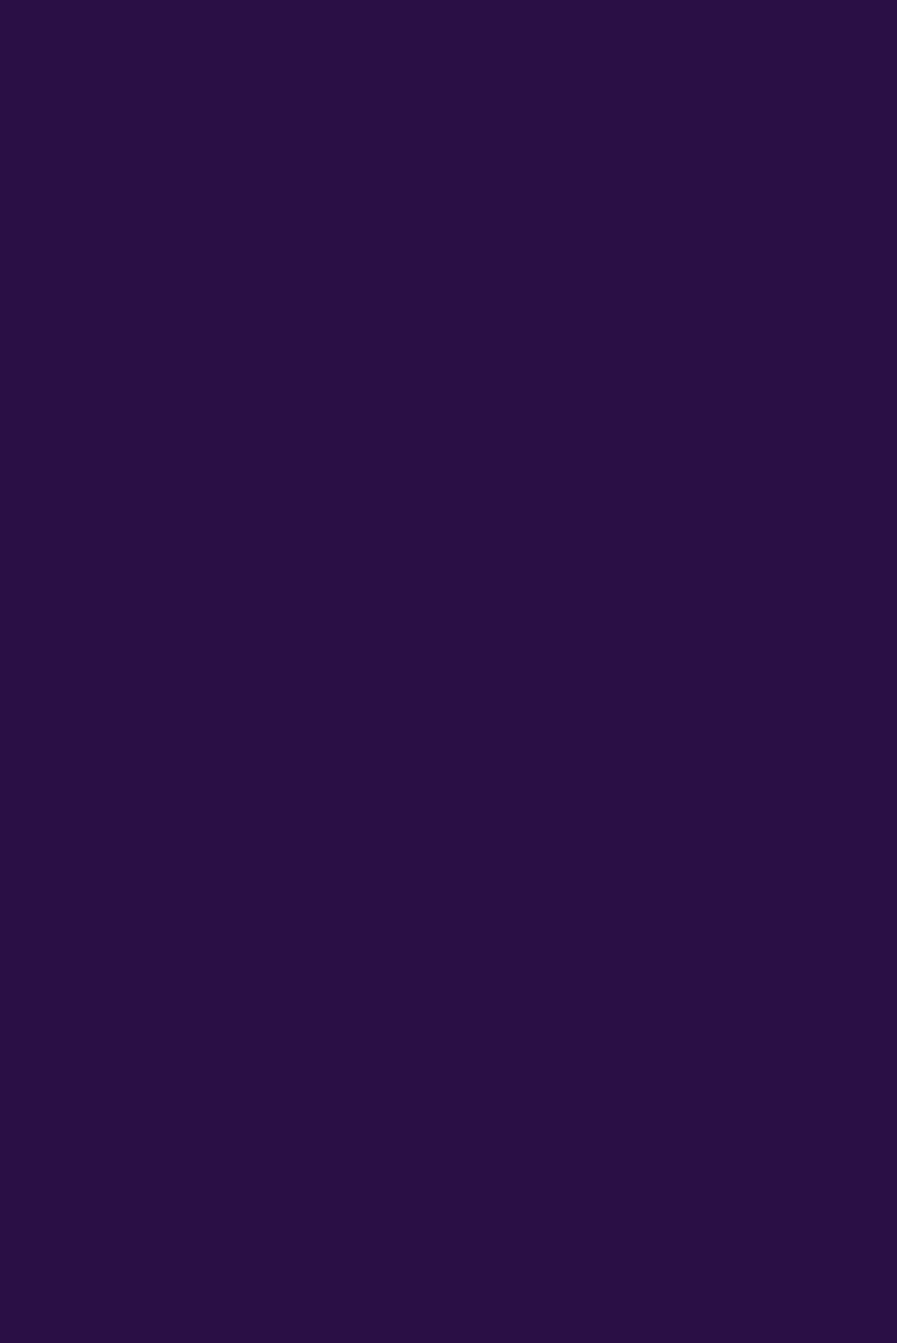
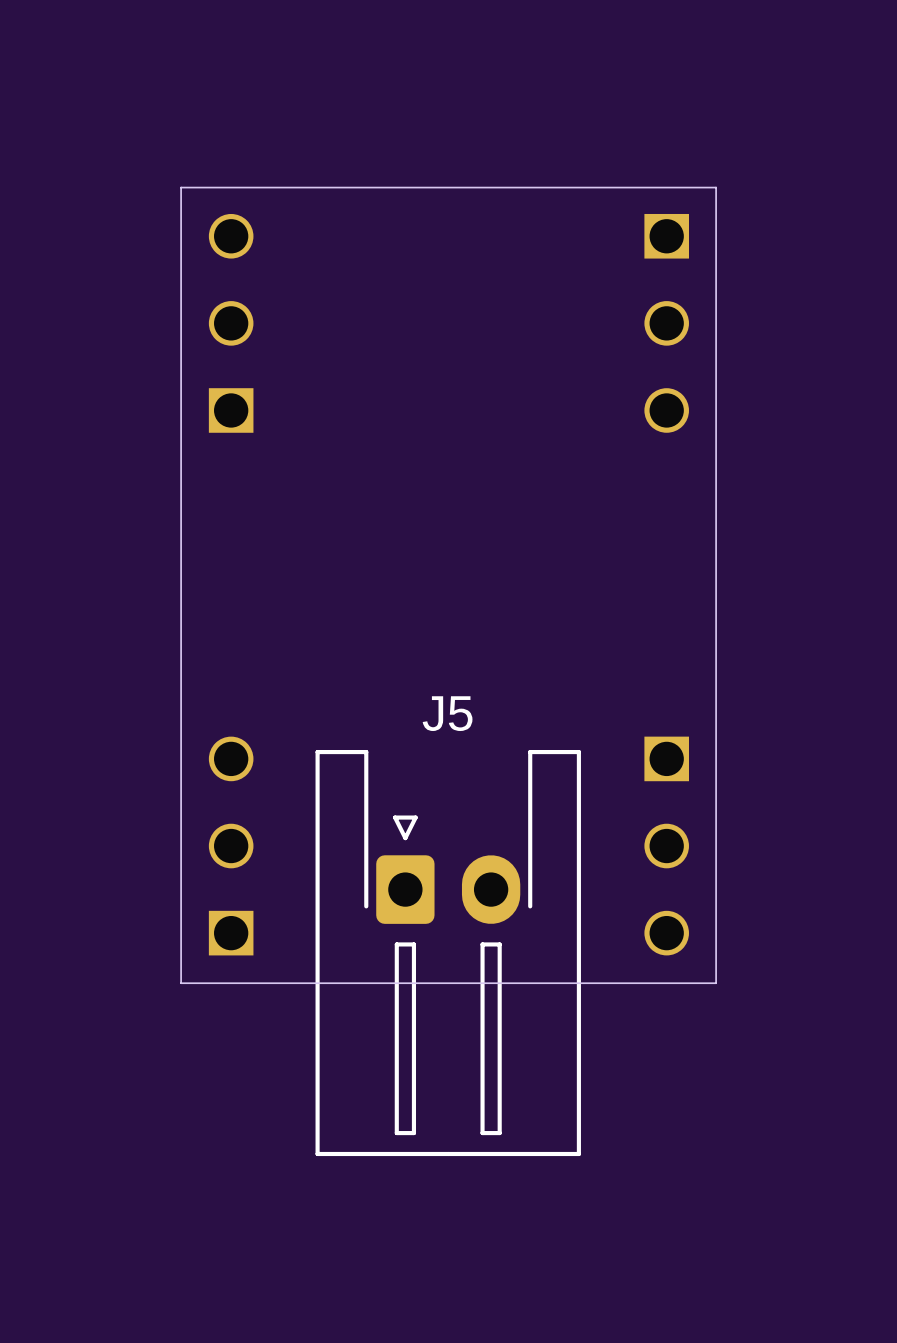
board edge: none -> (716, 187) (716, 983) (181, 983) (181, 187) (716, 187)
part: none -> (231, 323)
part: none -> (666, 323)
part: none -> (231, 846)
part: none -> (666, 846)
J5: none -> (448, 953)

